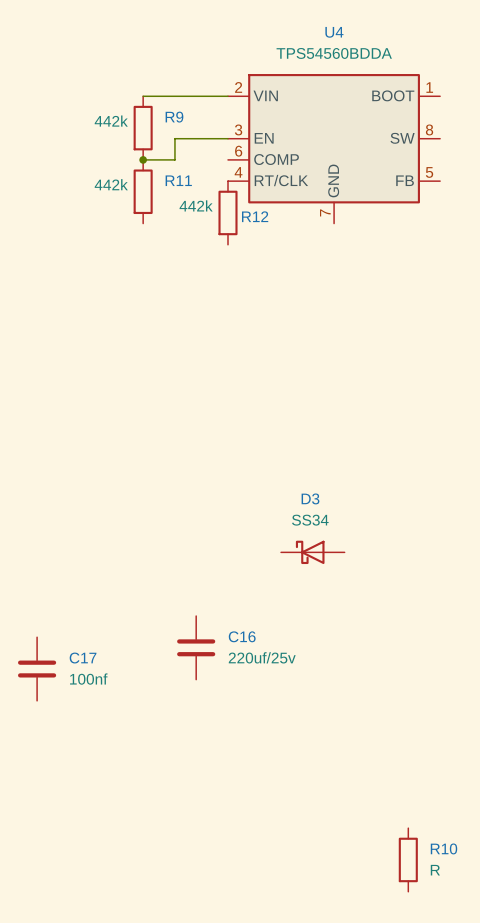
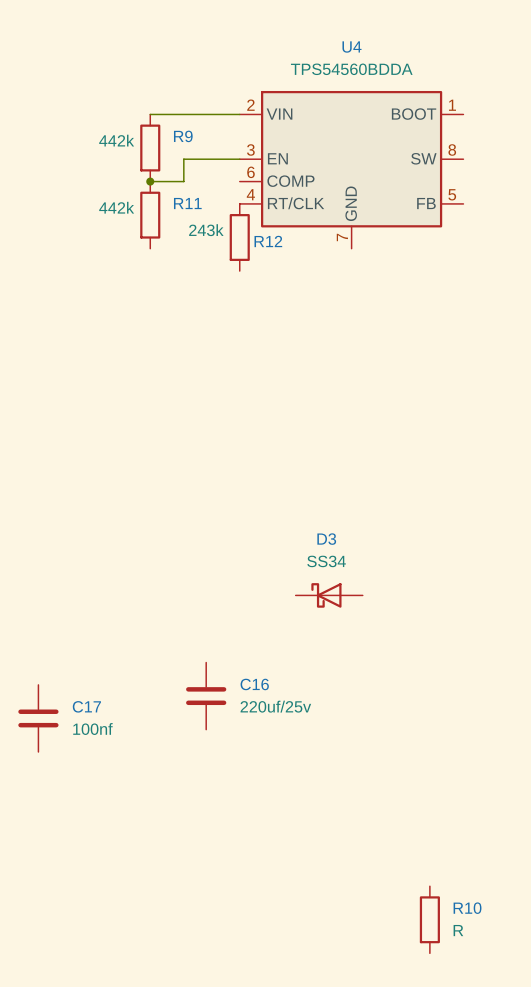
R12 value: 442k (196, 205) -> 243k (206, 230)

